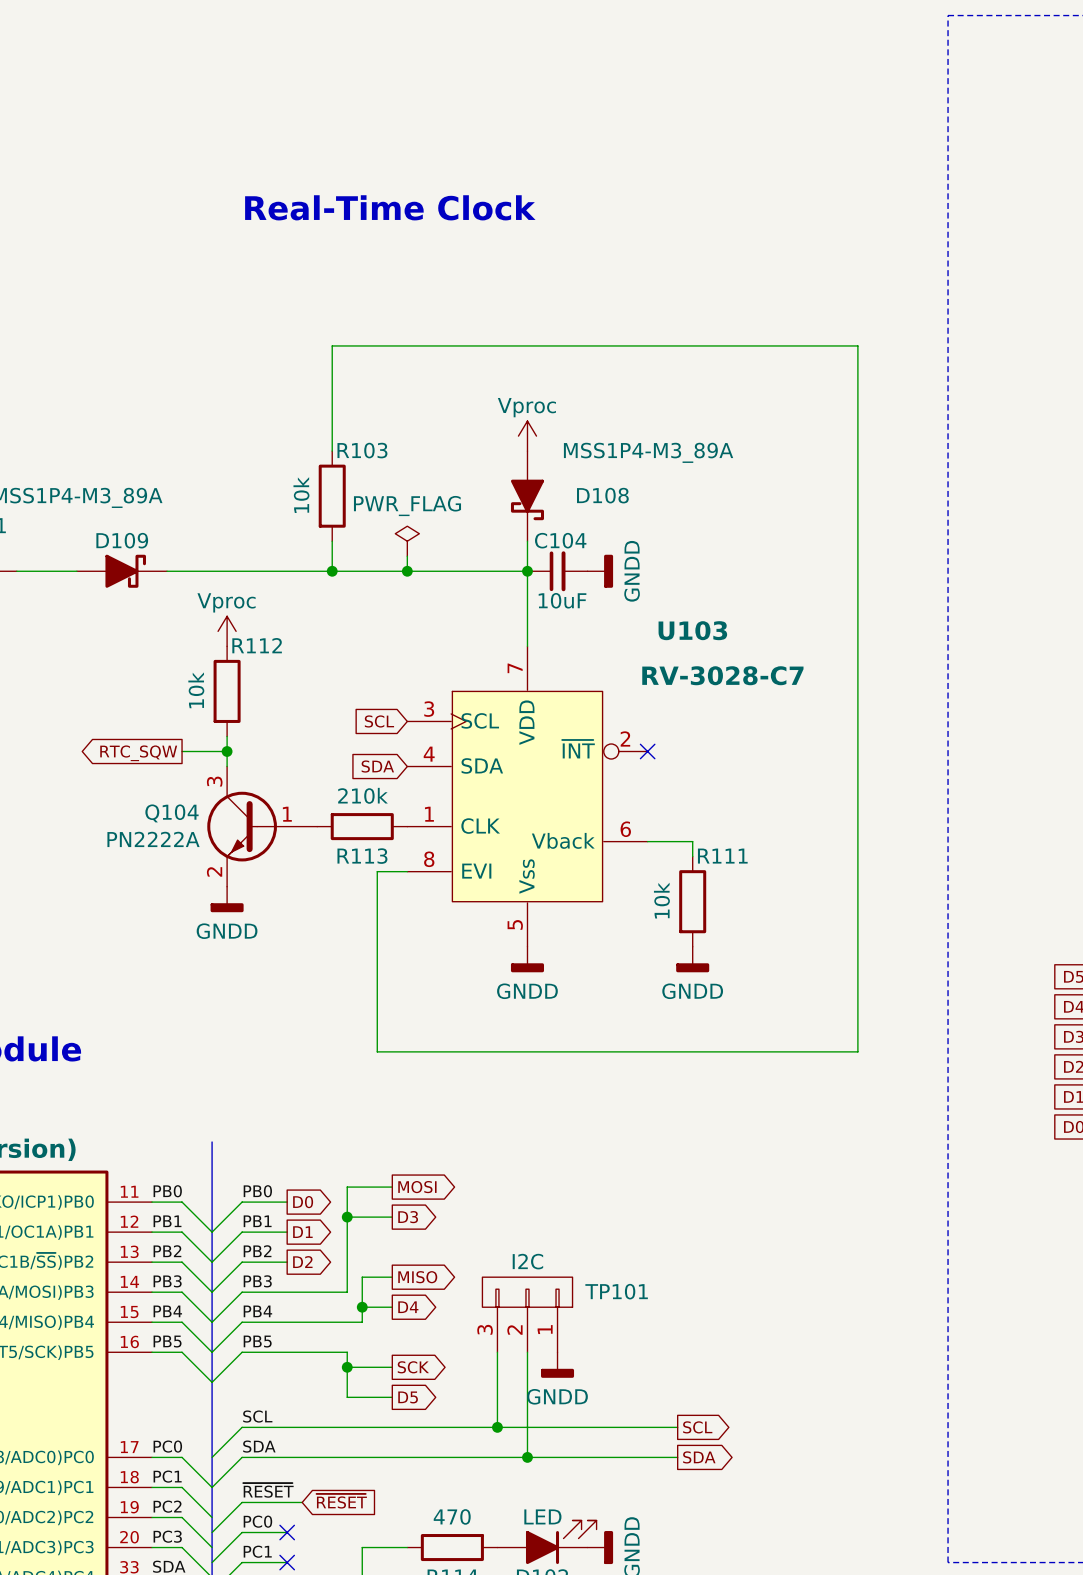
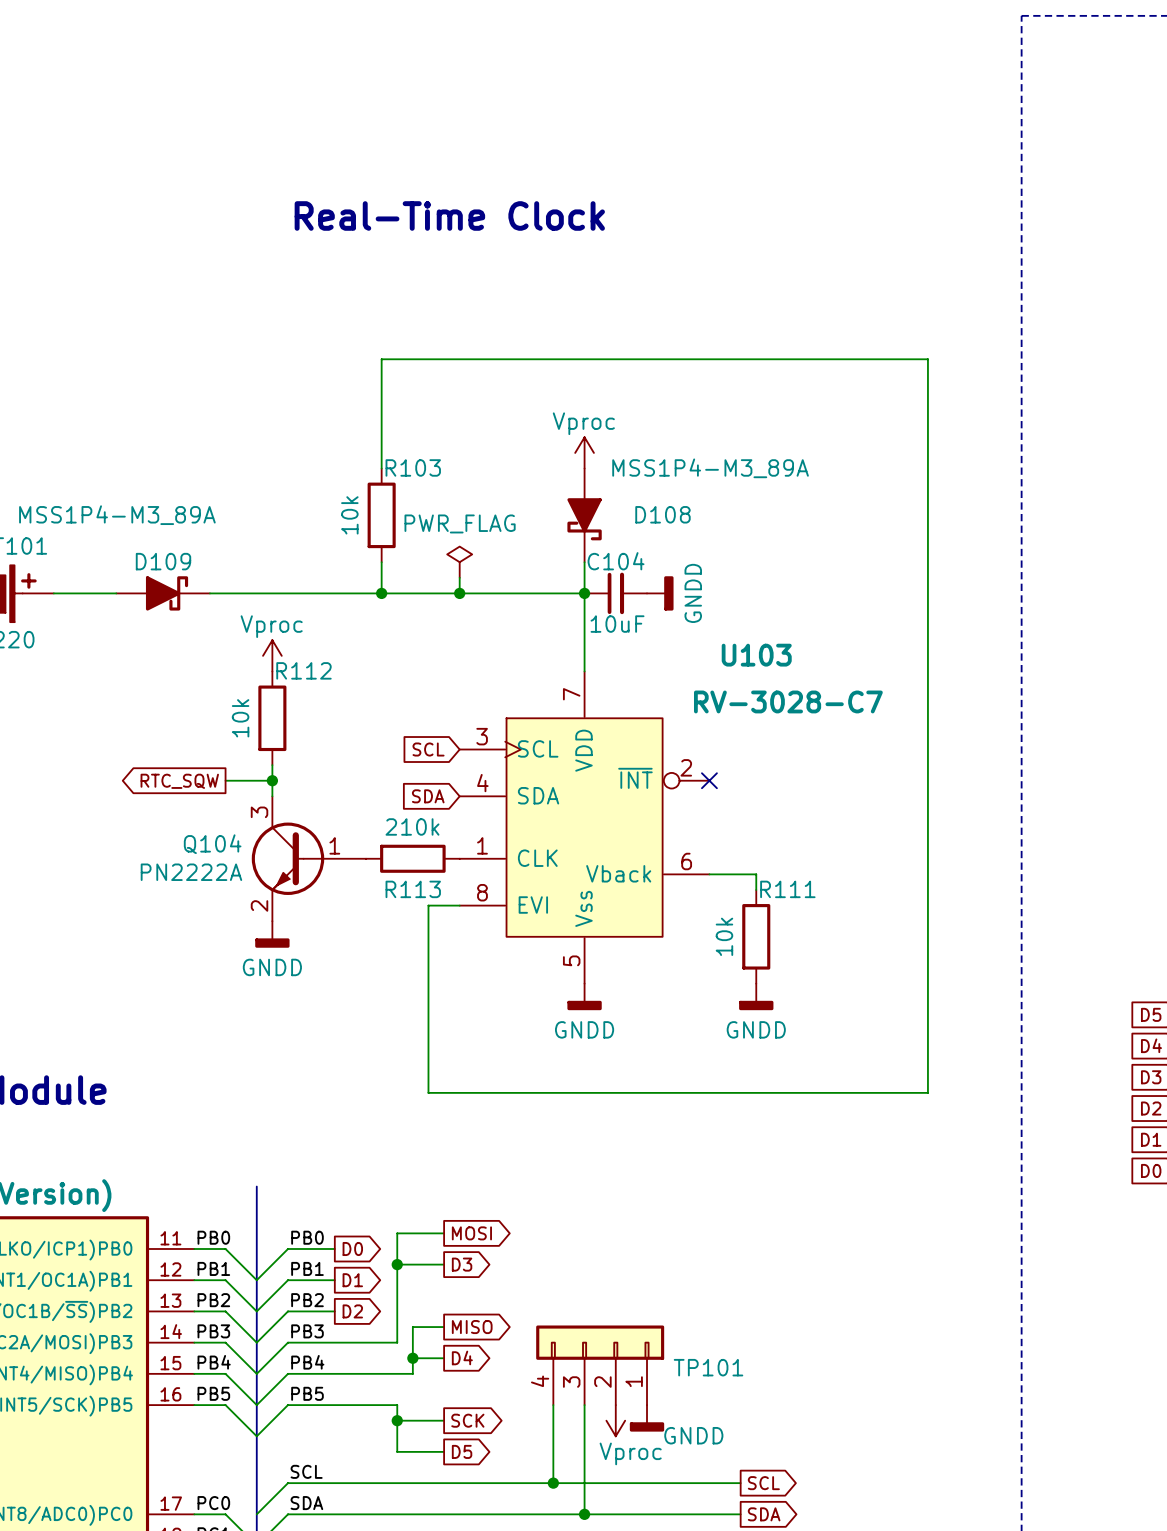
TP101 value: I2C (527, 1261) -> none
TP101 symbol: [482, 1277, 573, 1353] -> [536, 1325, 665, 1406]
TP101 name position: TP101 (616, 1291) -> TP101 (708, 1367)
power symbol: GNDD (557, 1365) -> Vproc (615, 1420)
power symbol: none -> GNDD (647, 1418)

